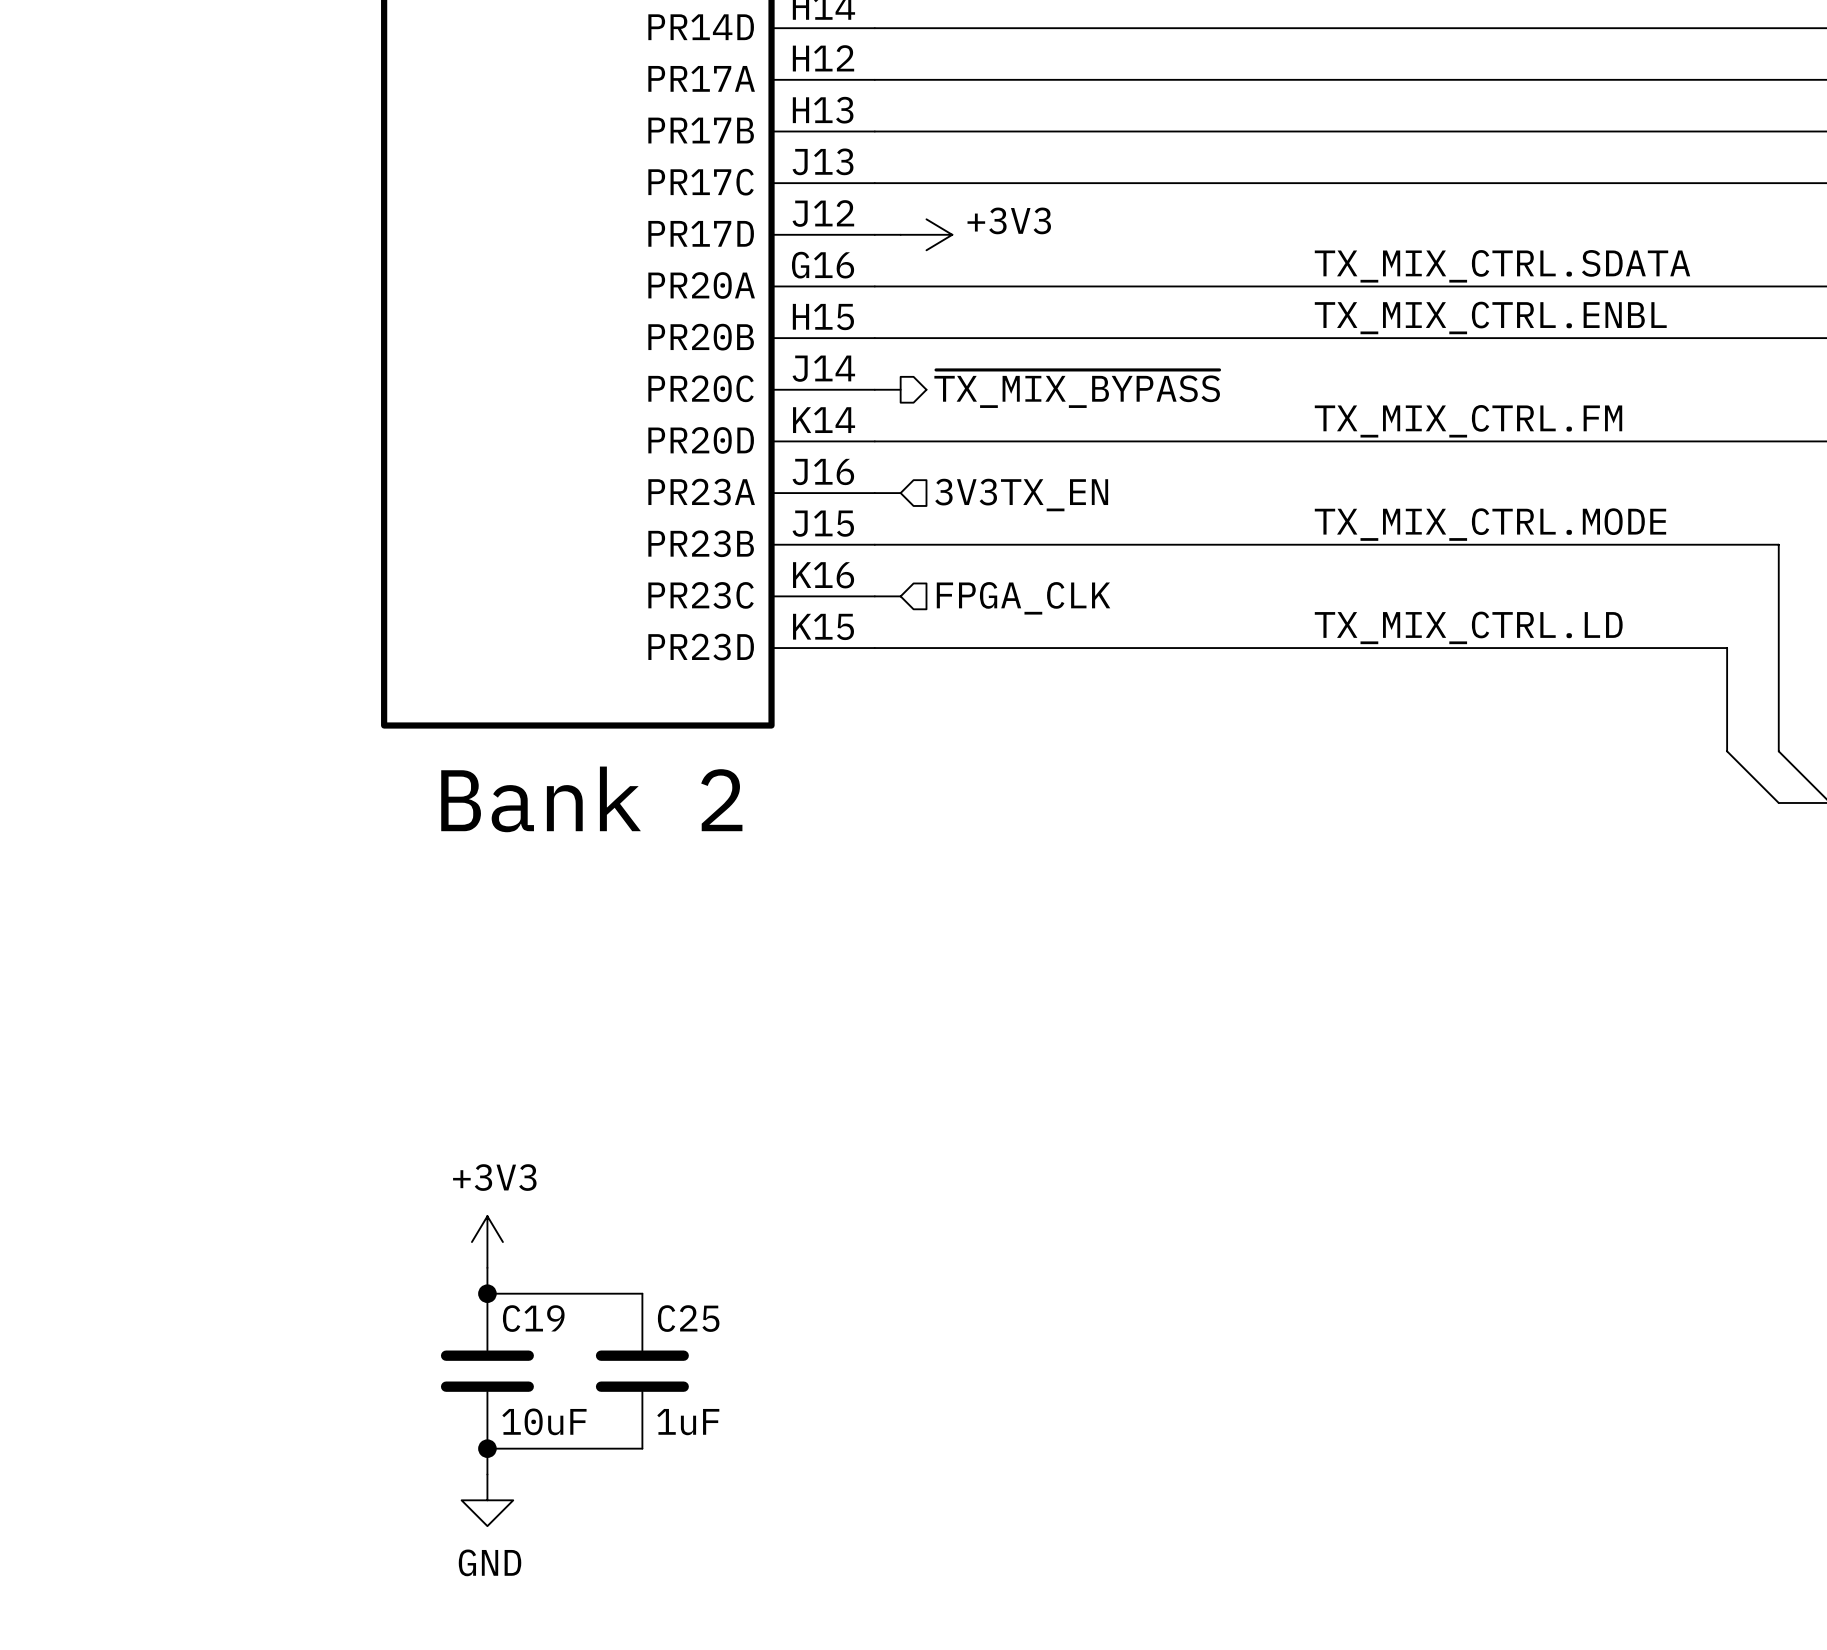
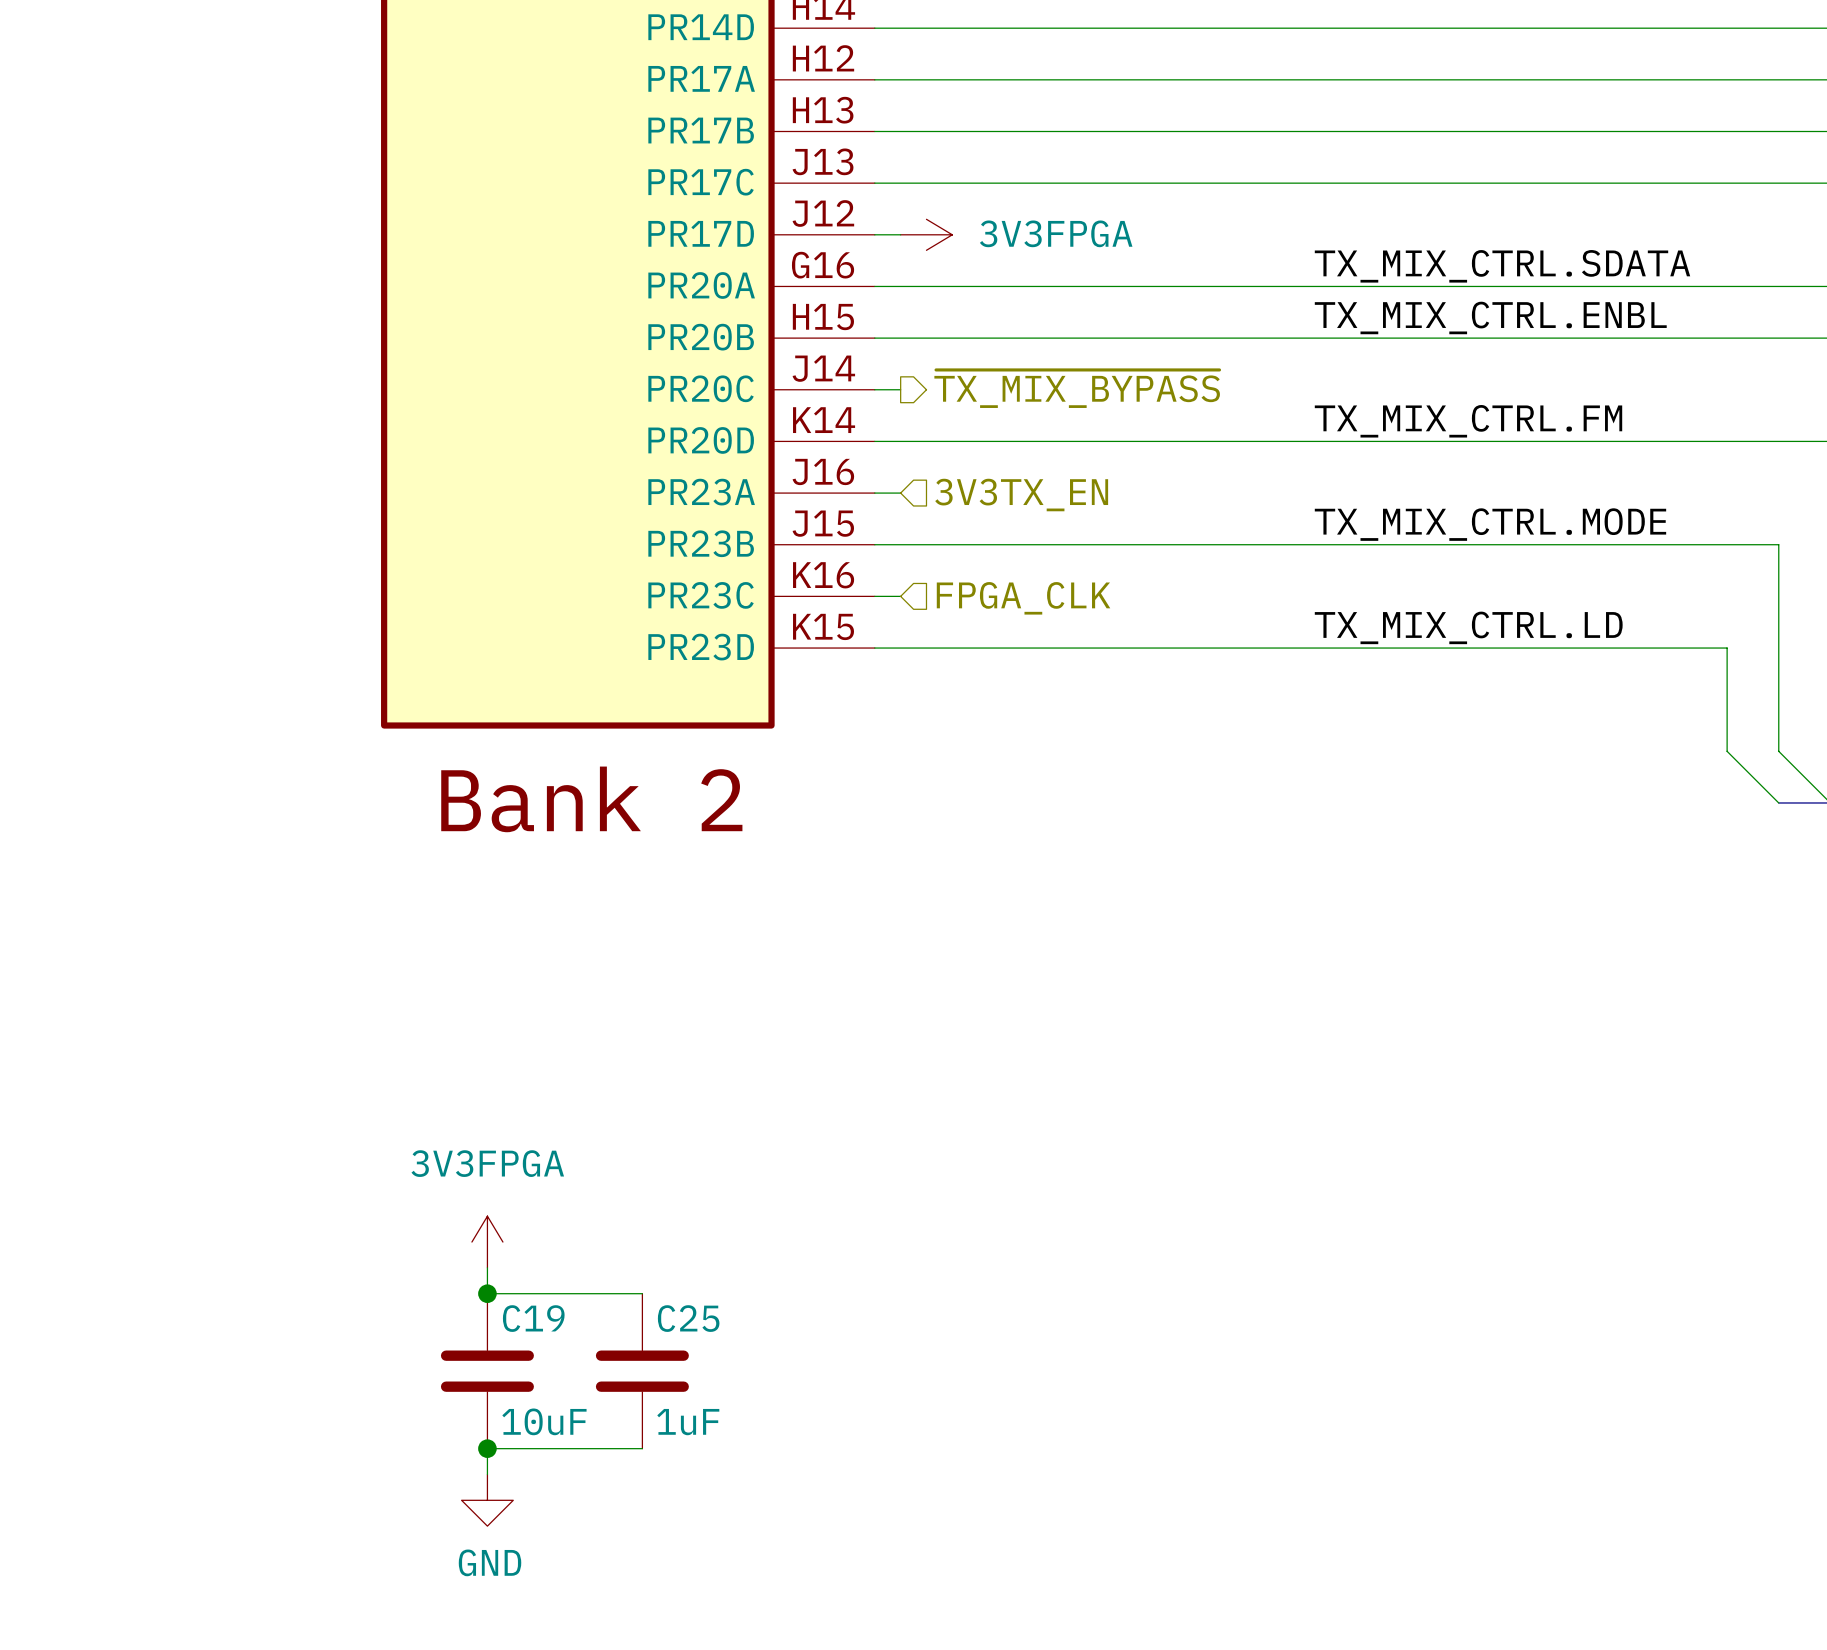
power symbol: +3V3 (926, 234) -> 3V3FPGA (926, 234)
power symbol: +3V3 (487, 1242) -> 3V3FPGA (487, 1242)

